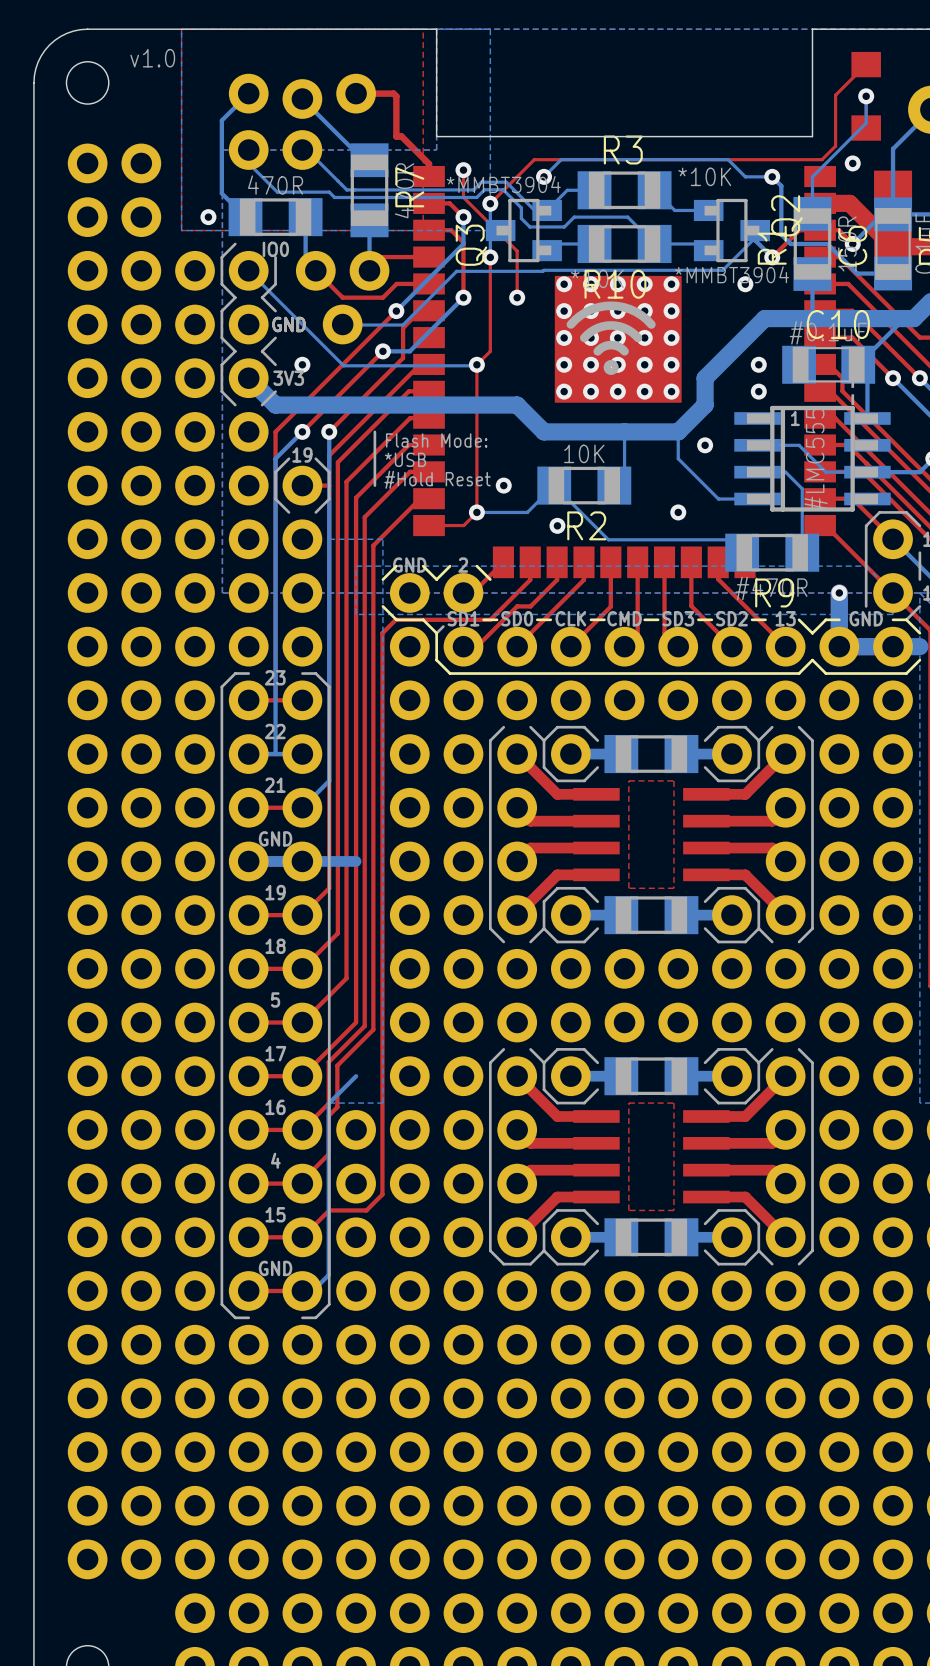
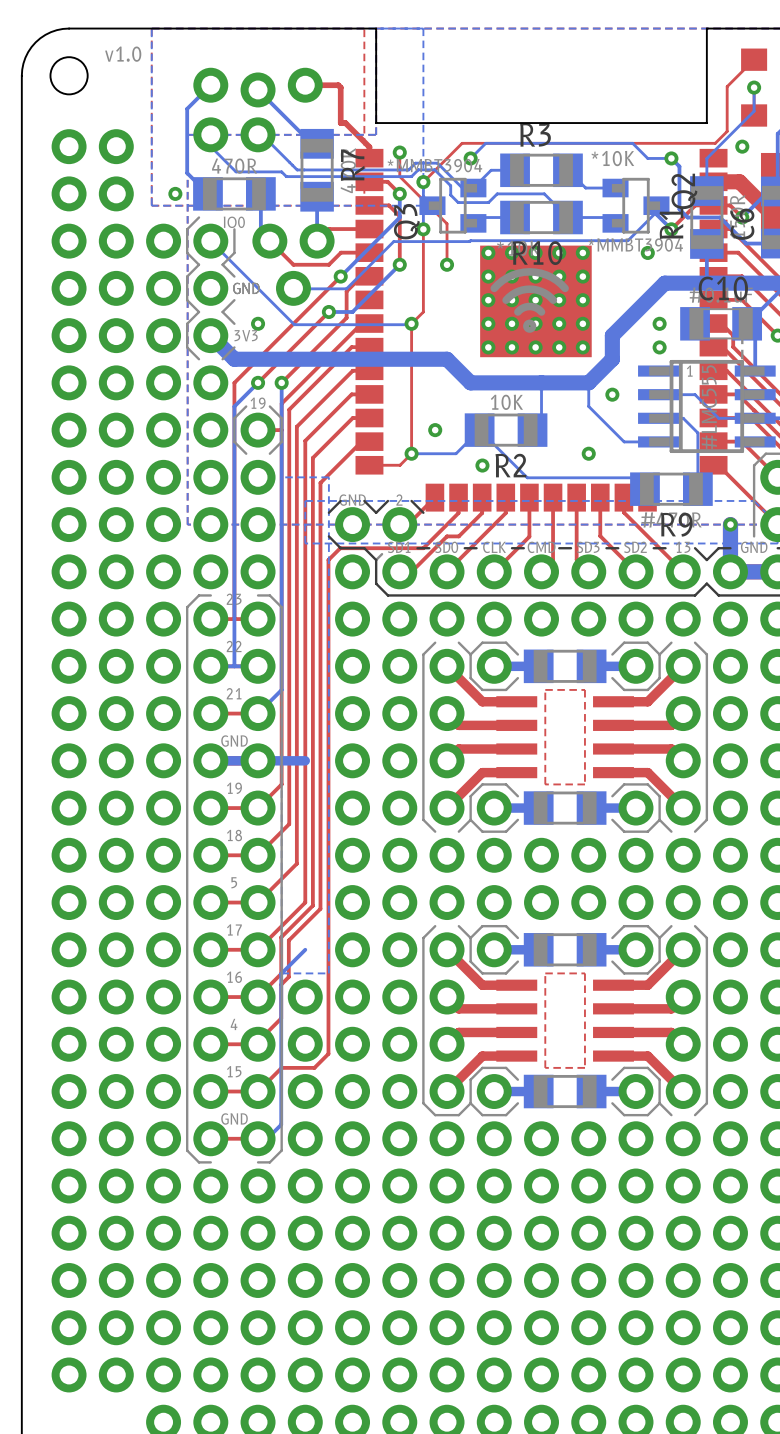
line: (374, 431) (374, 485) -> none
text: Flash Mode: (436, 440) -> none
text: *USB (405, 459) -> none
text: #Hold Reset (437, 479) -> none

